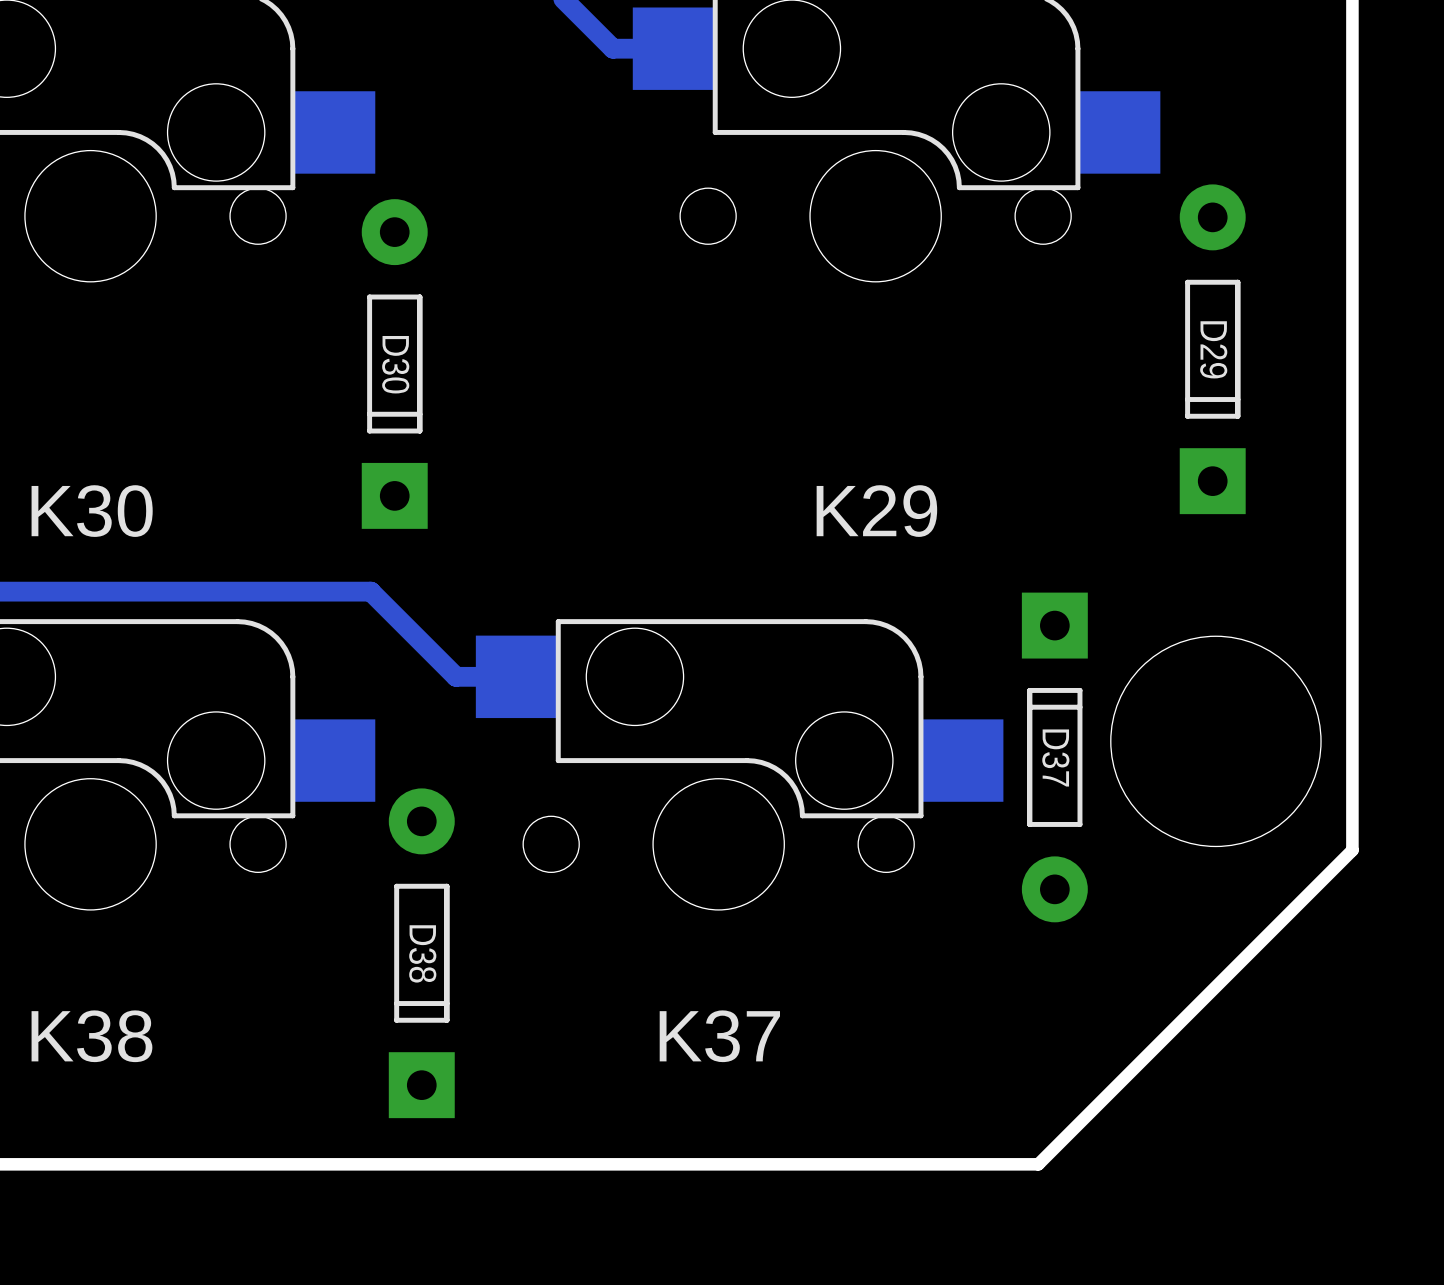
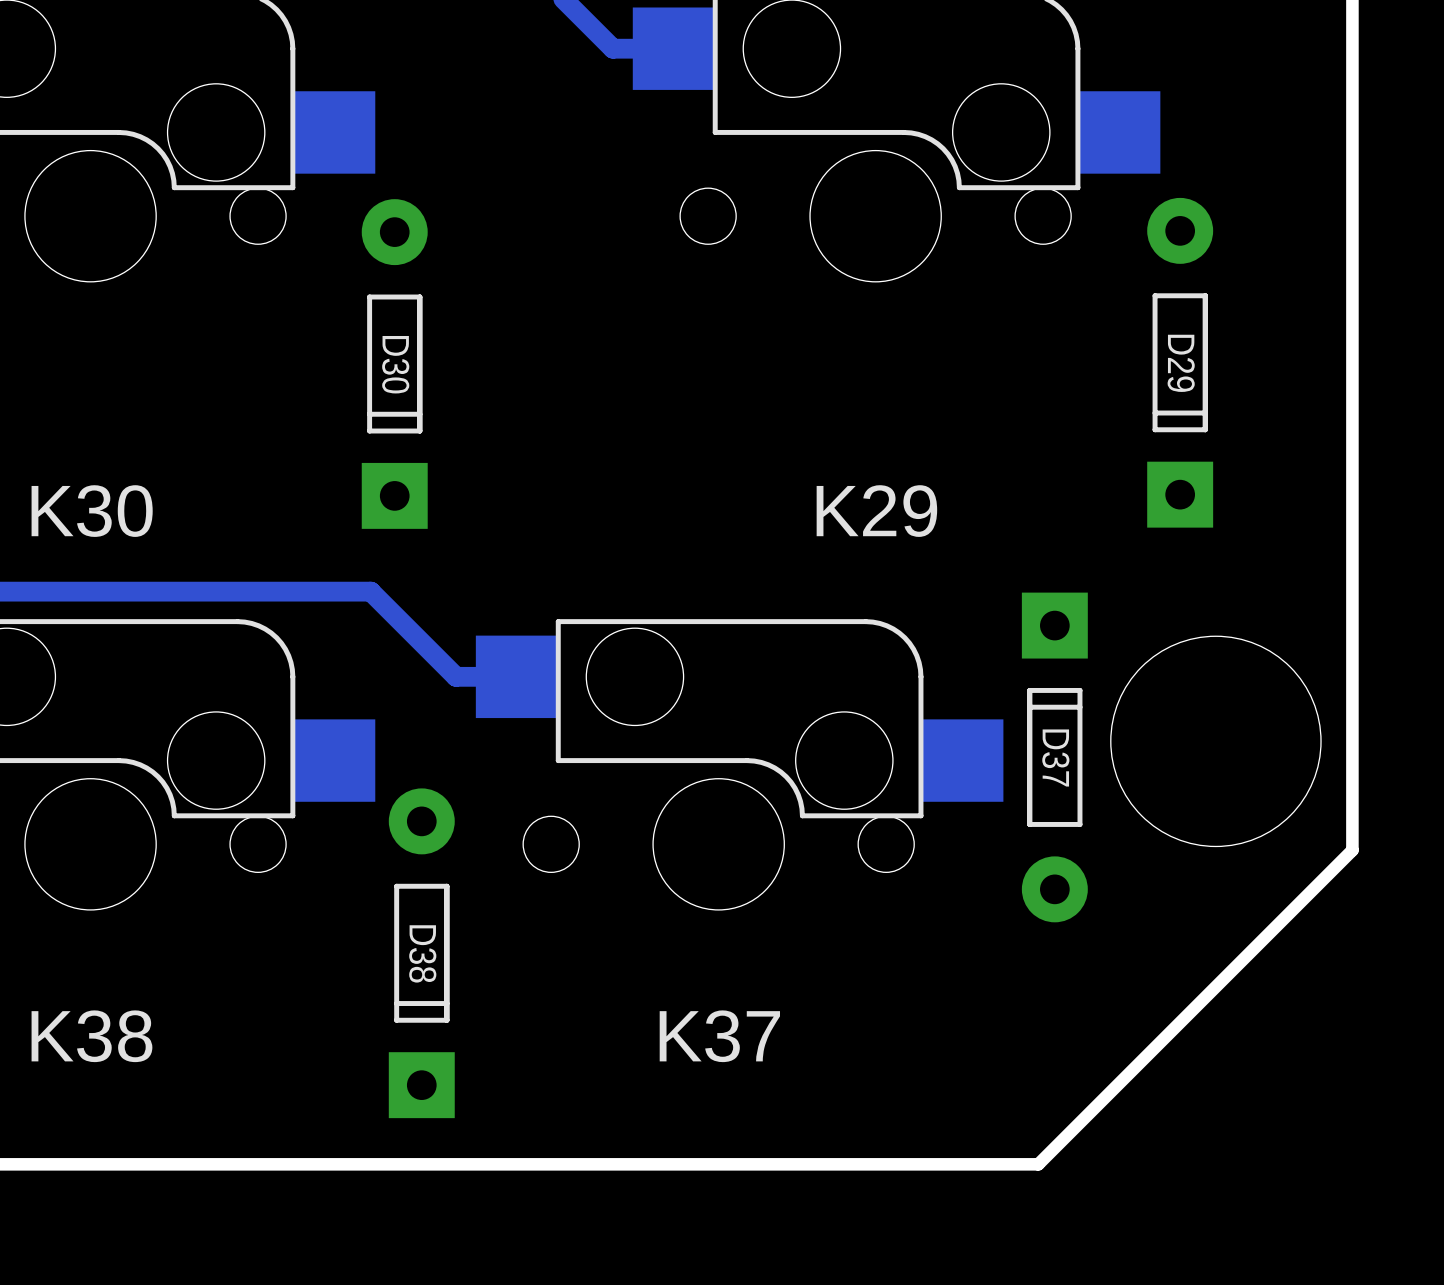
D29 position: (1212, 349) -> (1180, 362)

